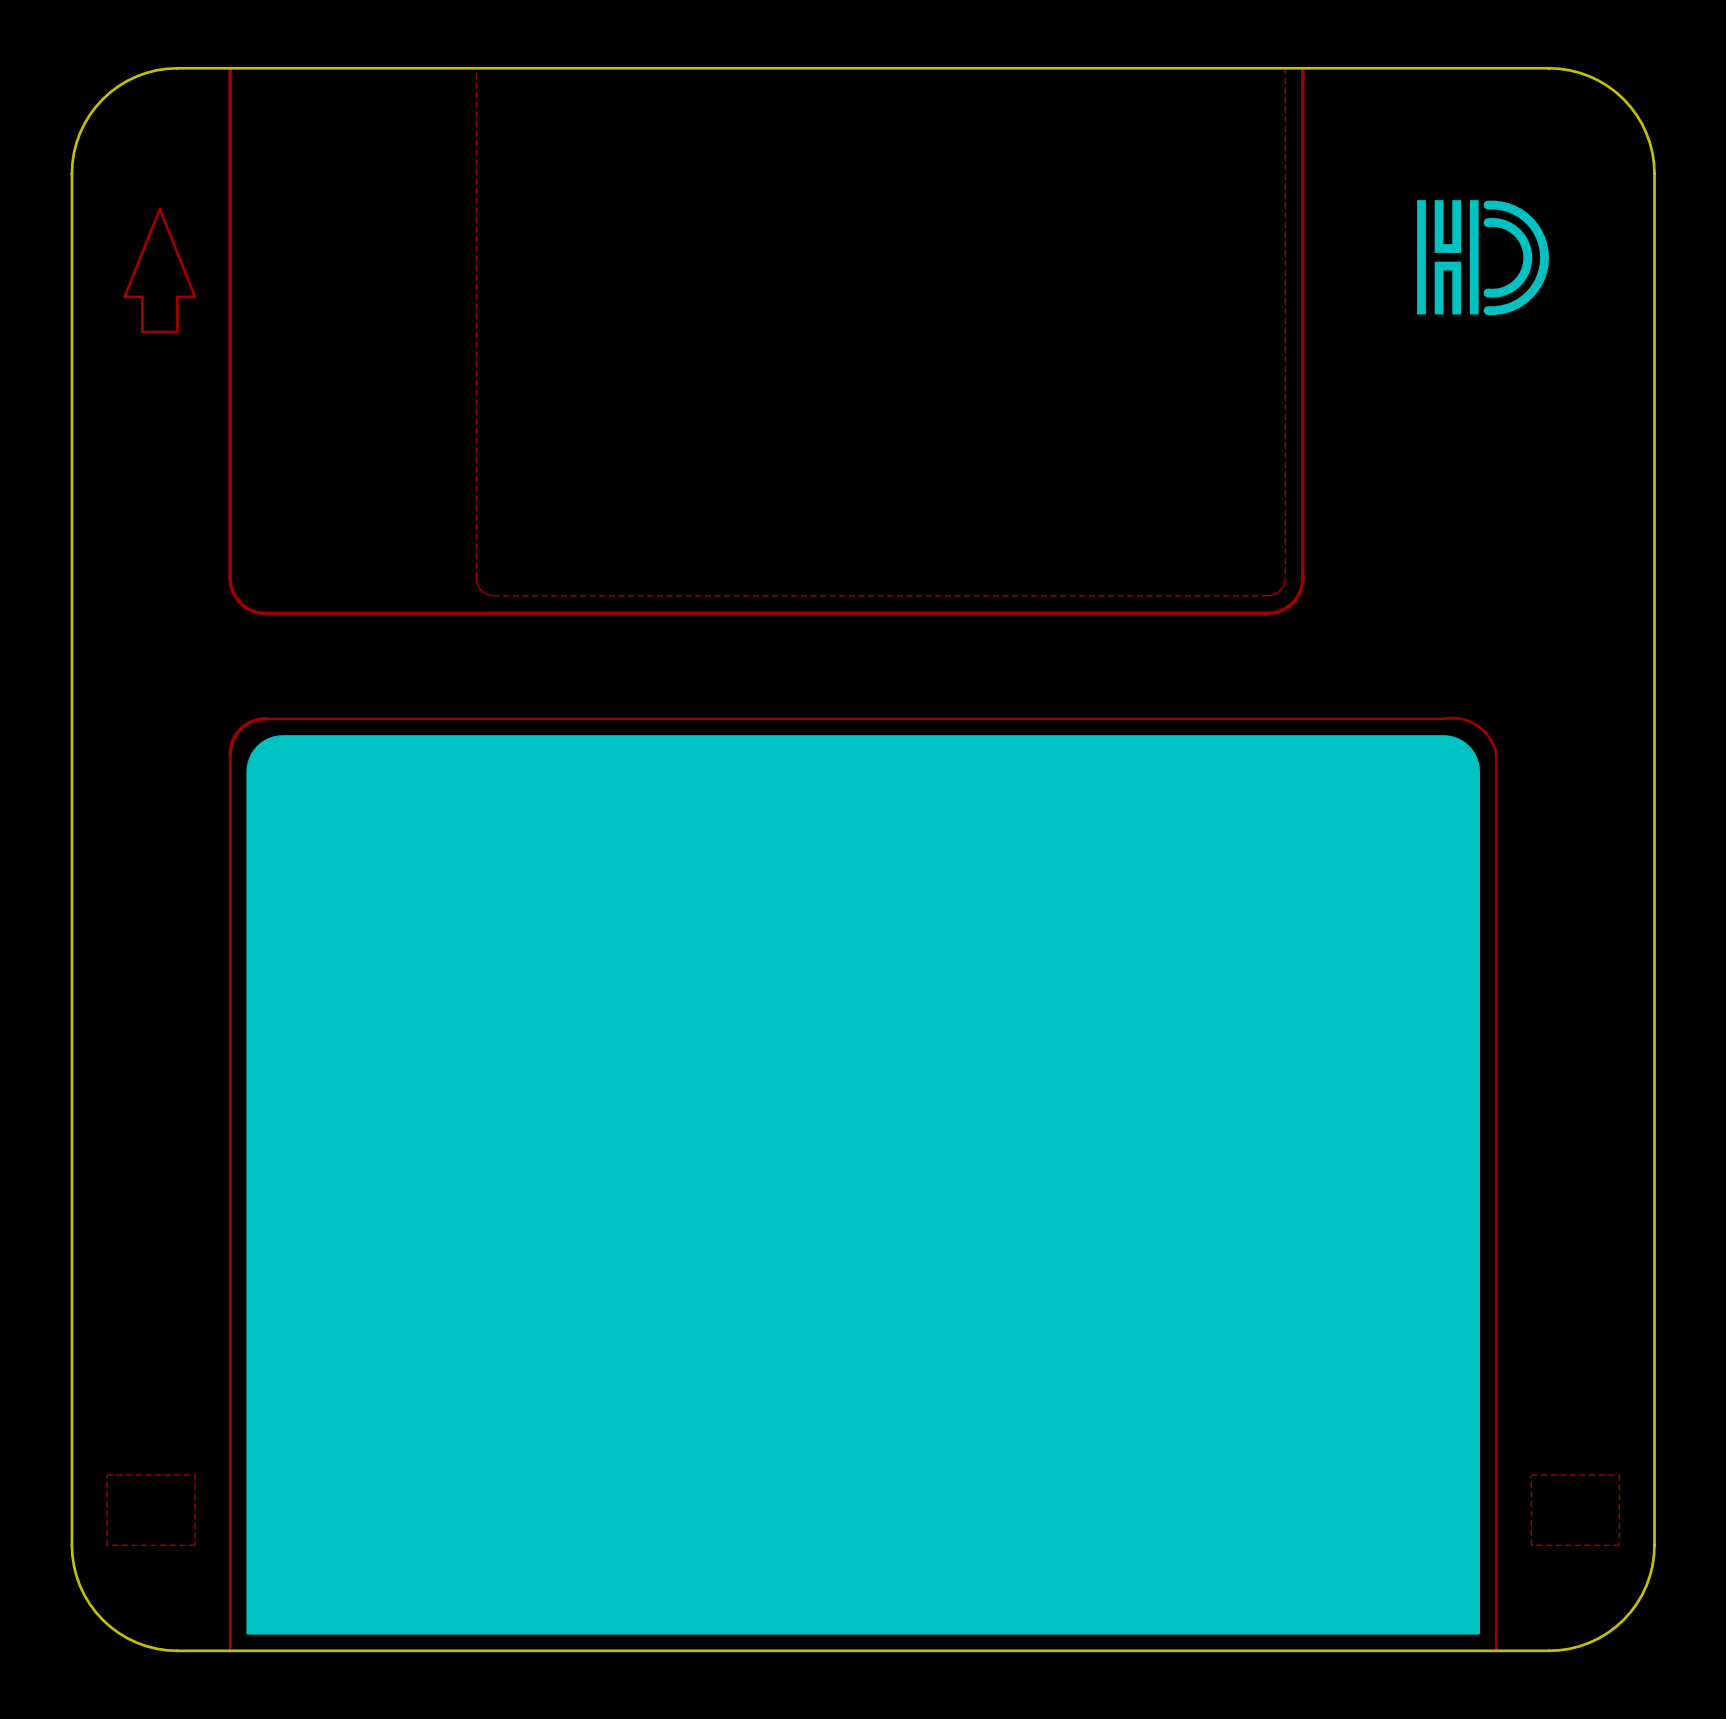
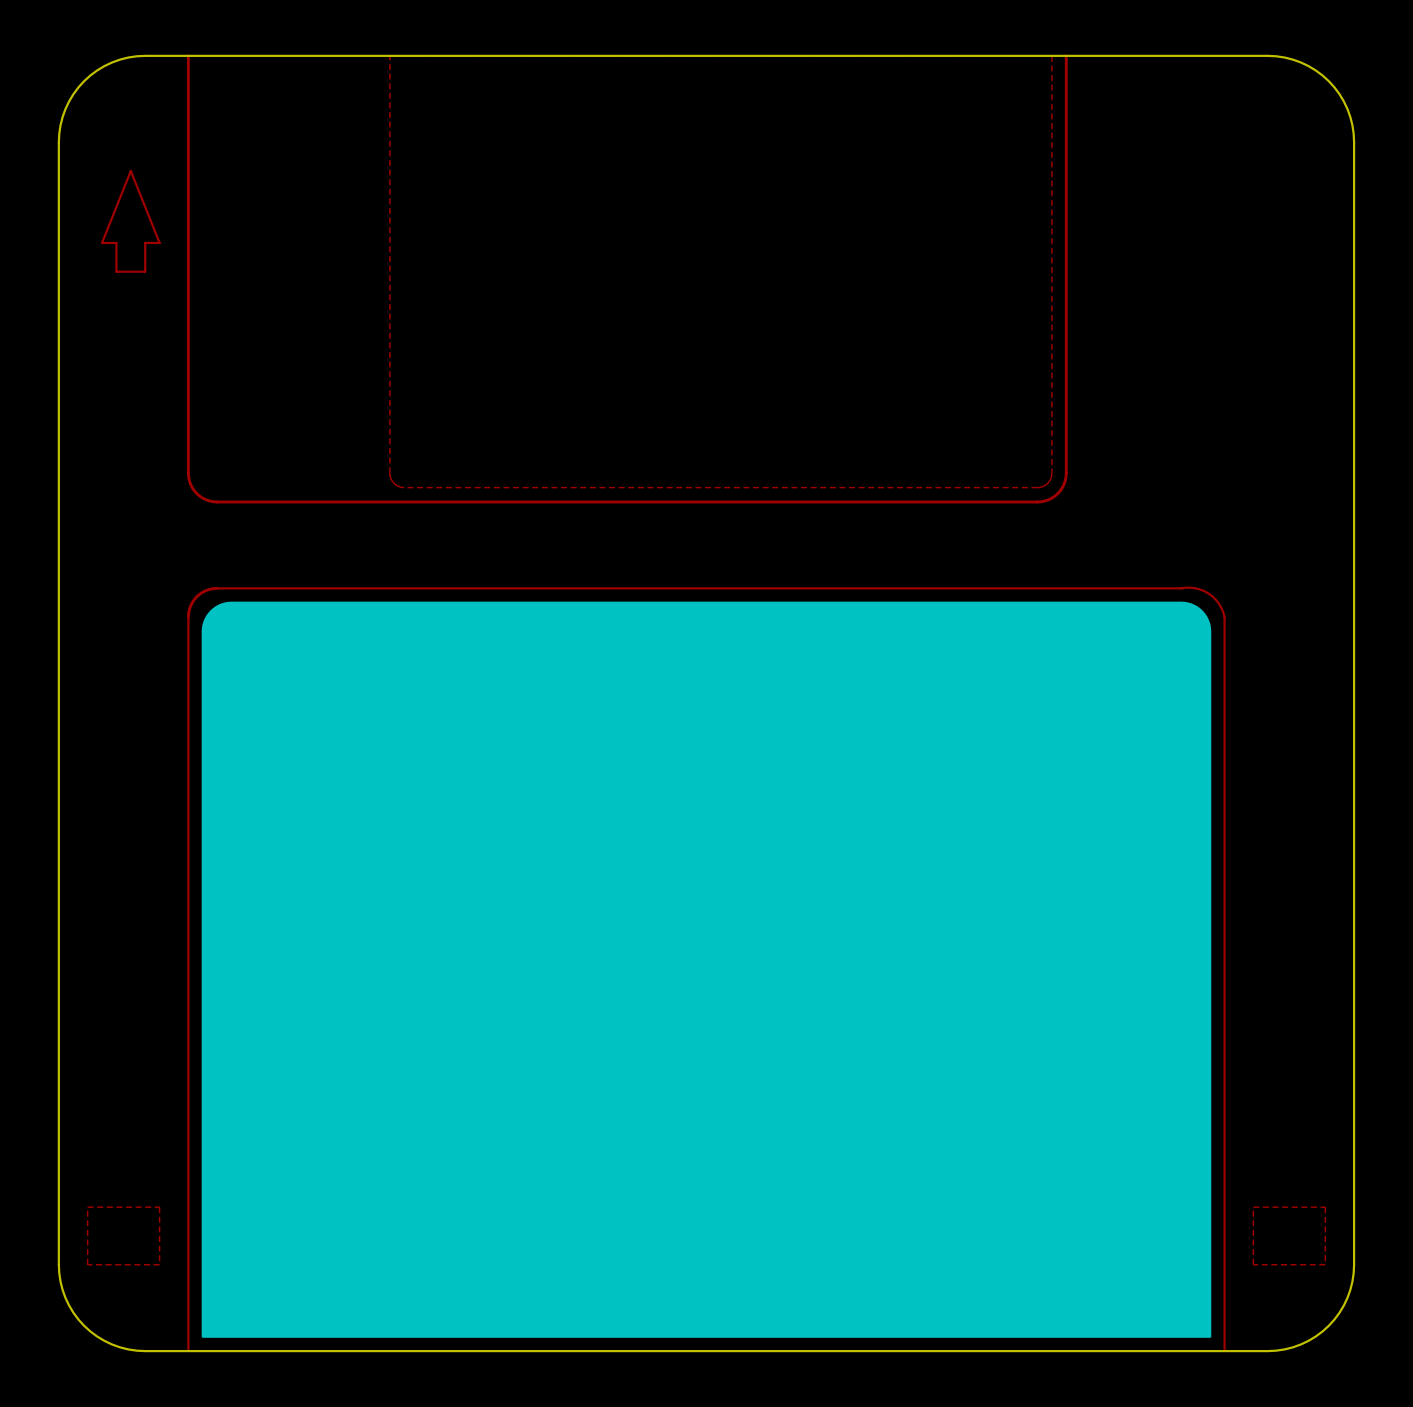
drawing: [1417, 200, 1479, 315] -> none
line: (1487, 205) (1507, 207) (1525, 216) (1534, 226) (1540, 238) (1544, 257) (1540, 277) (1534, 289) (1525, 298) (1507, 308) (1487, 310) -> none
line: (1487, 222) (1506, 225) (1517, 232) (1525, 244) (1527, 257) (1525, 271) (1517, 282) (1506, 290) (1487, 292) -> none

